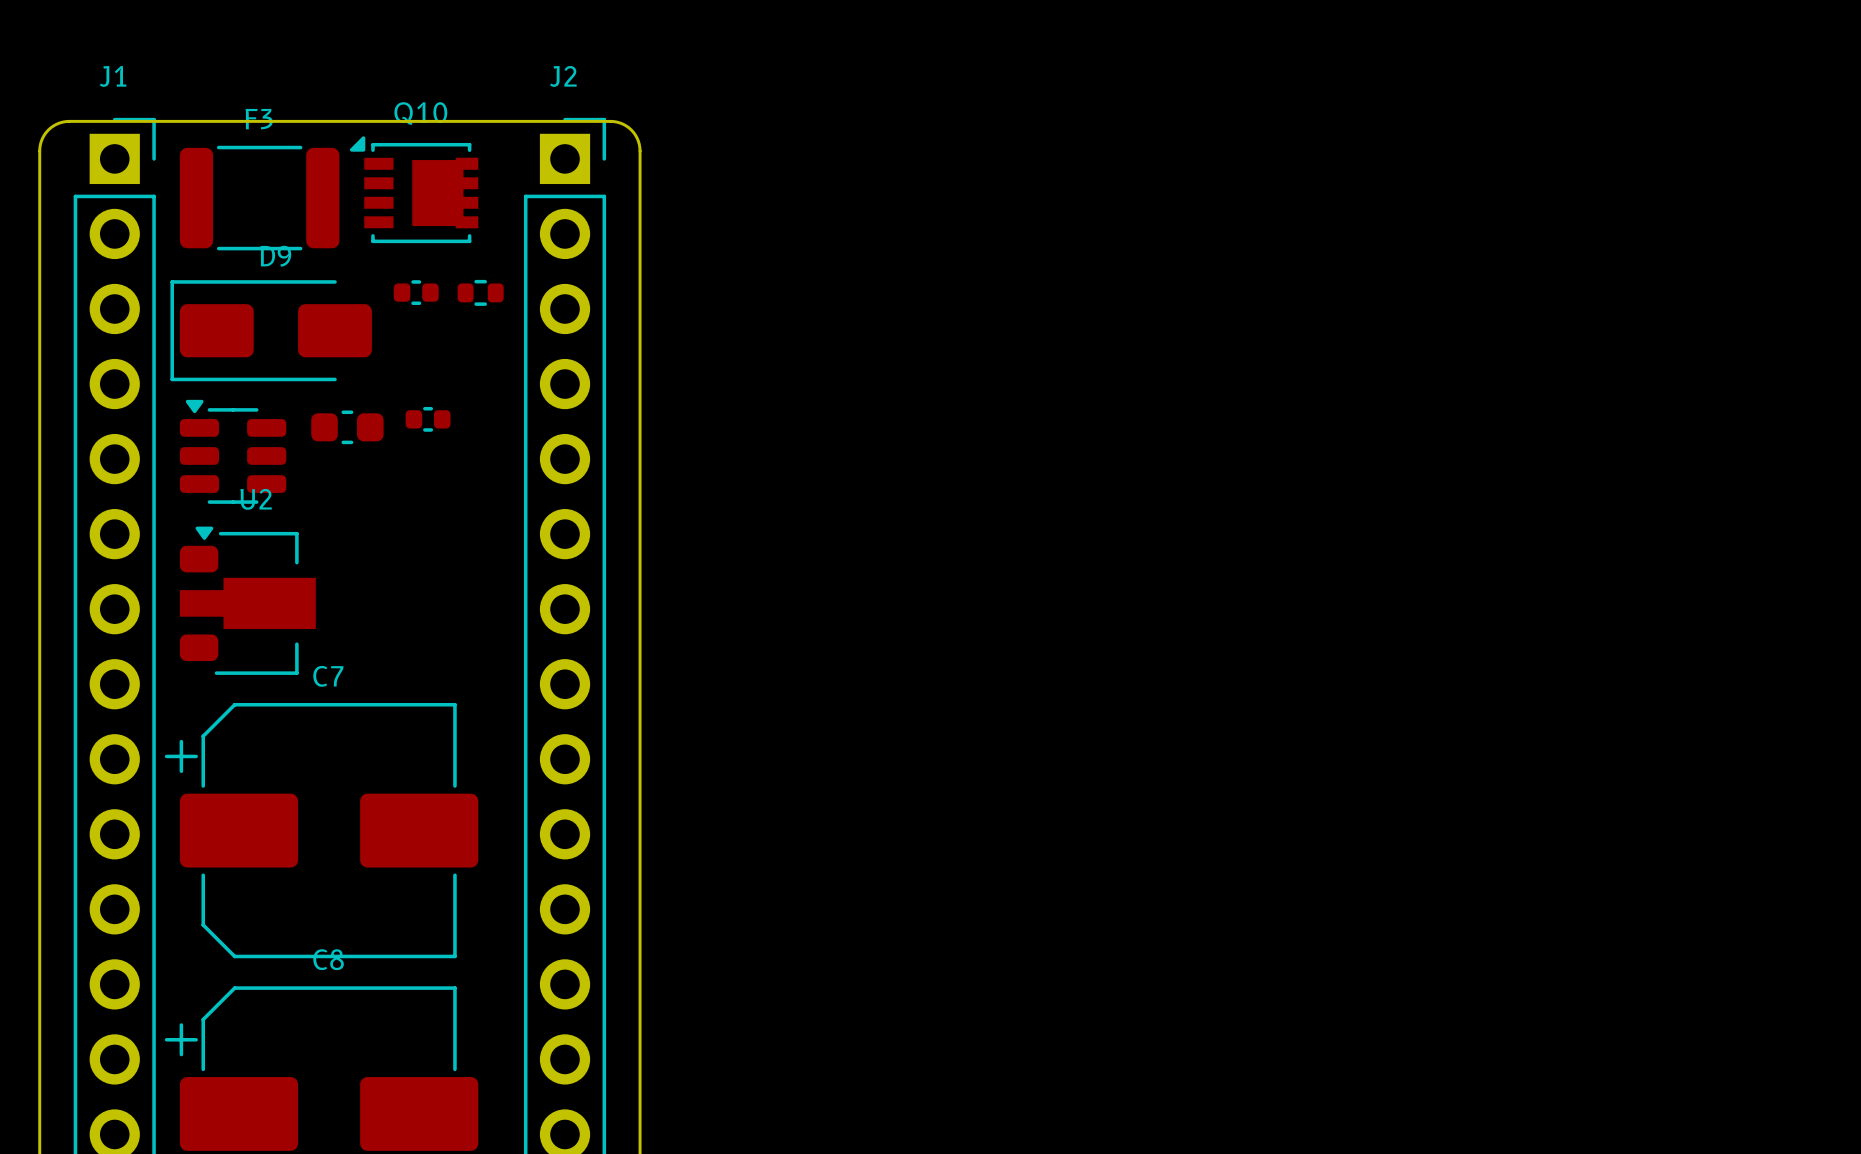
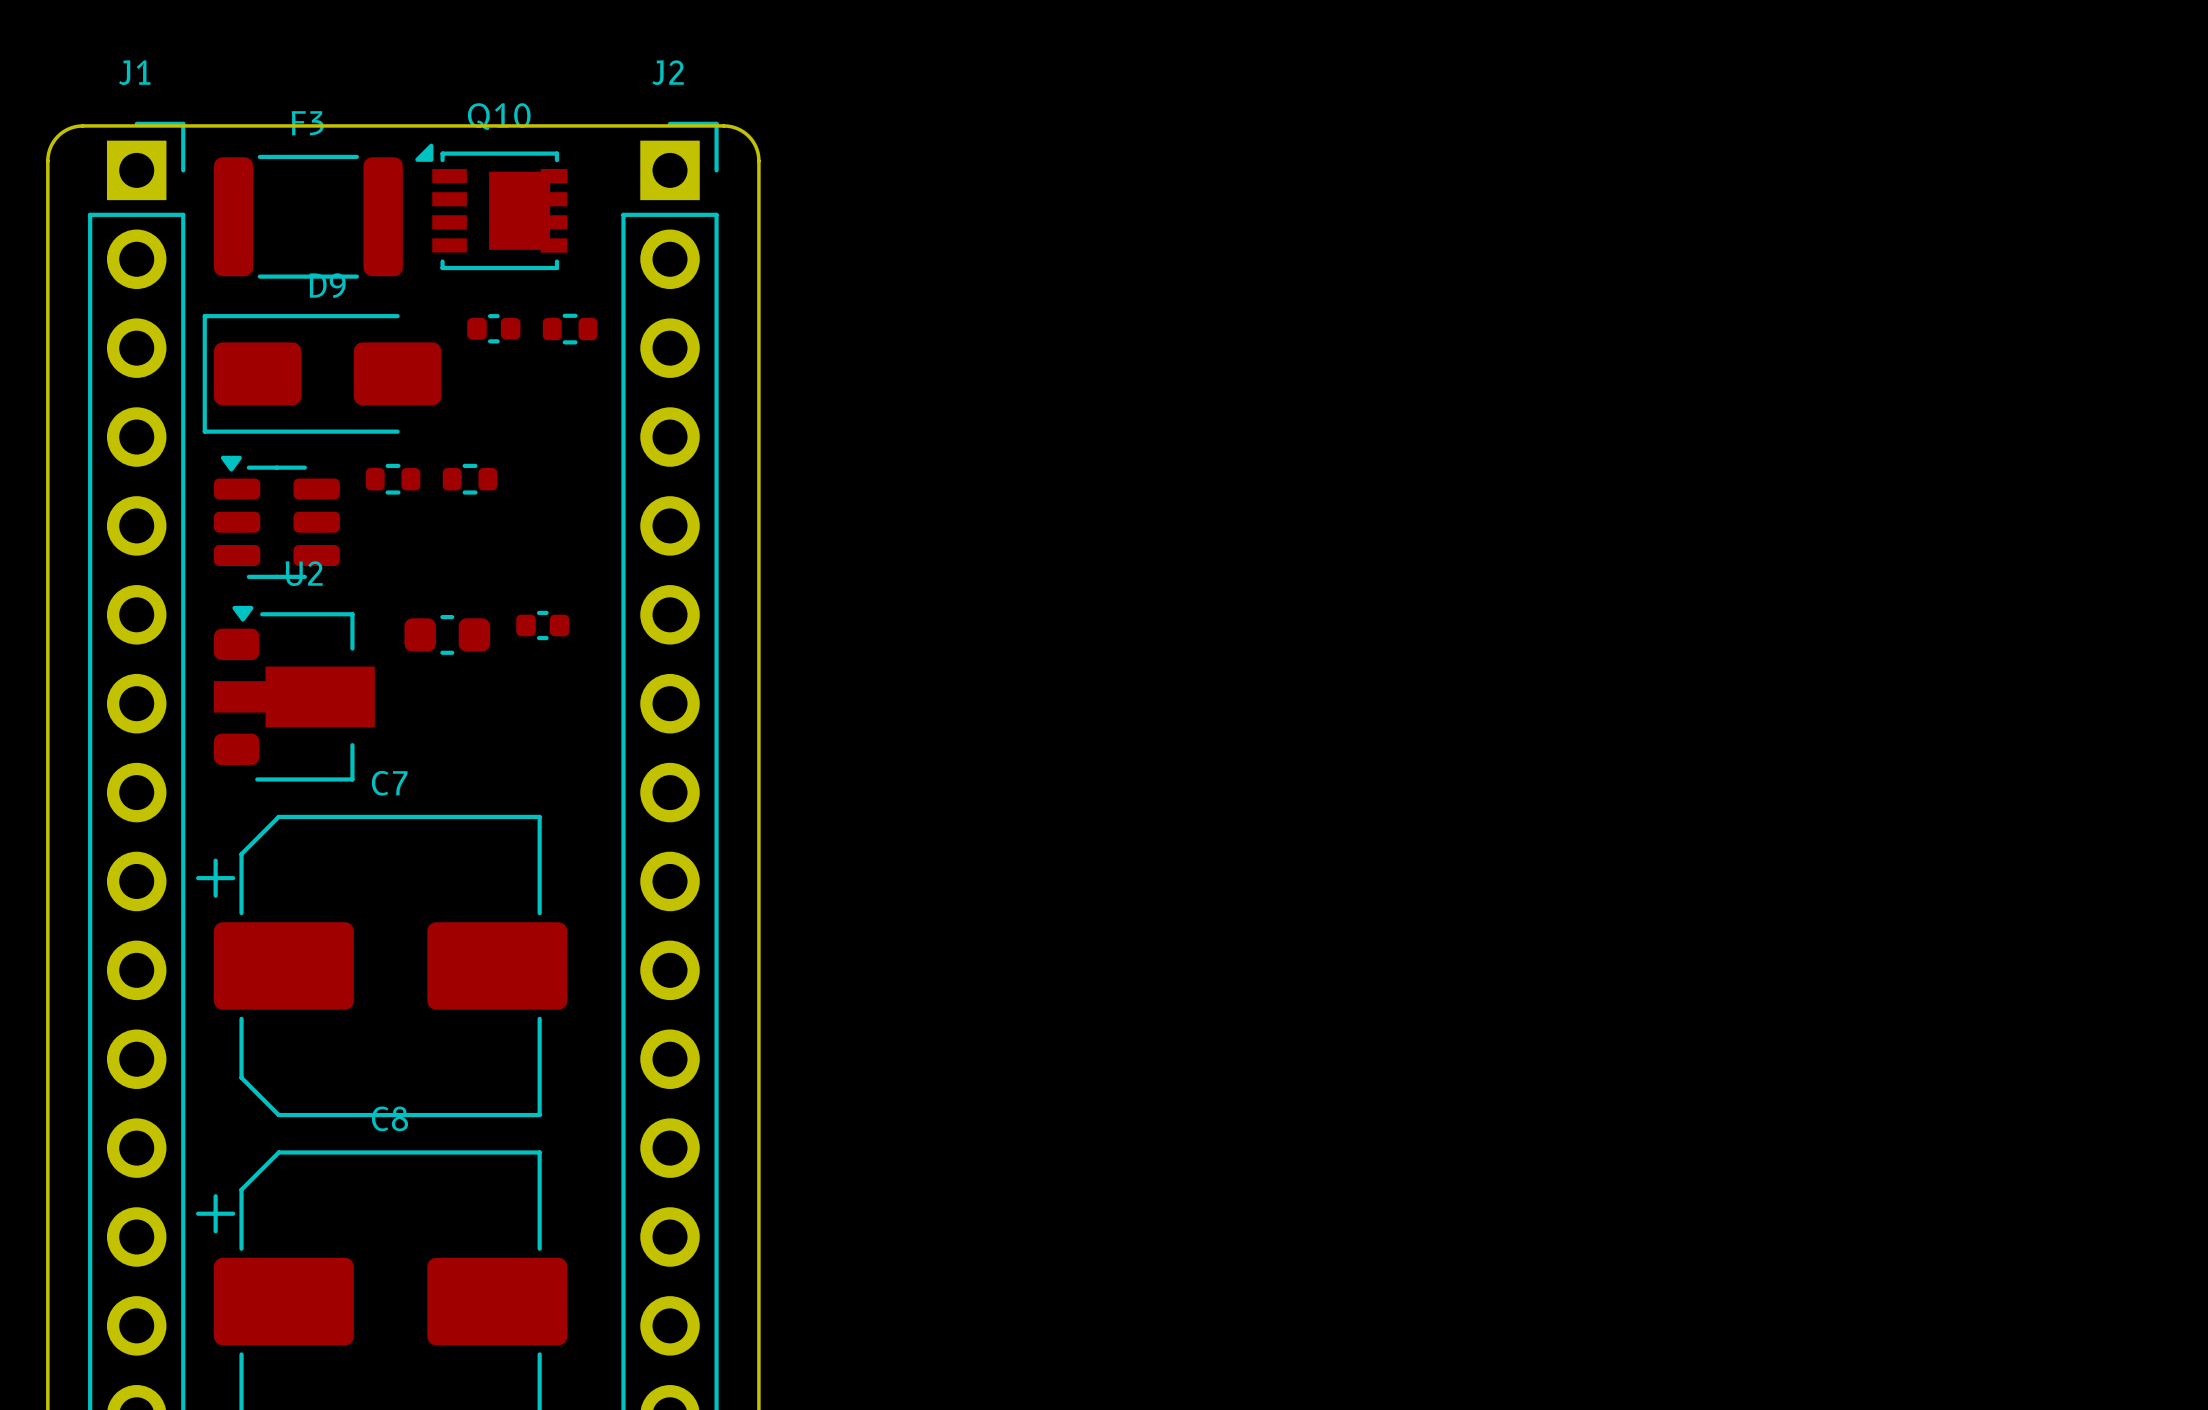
part footprint: [311, 410, 384, 445] -> [365, 463, 421, 495]
part: none -> (470, 479)
part position: (428, 419) -> (542, 625)
part: none -> (447, 634)

